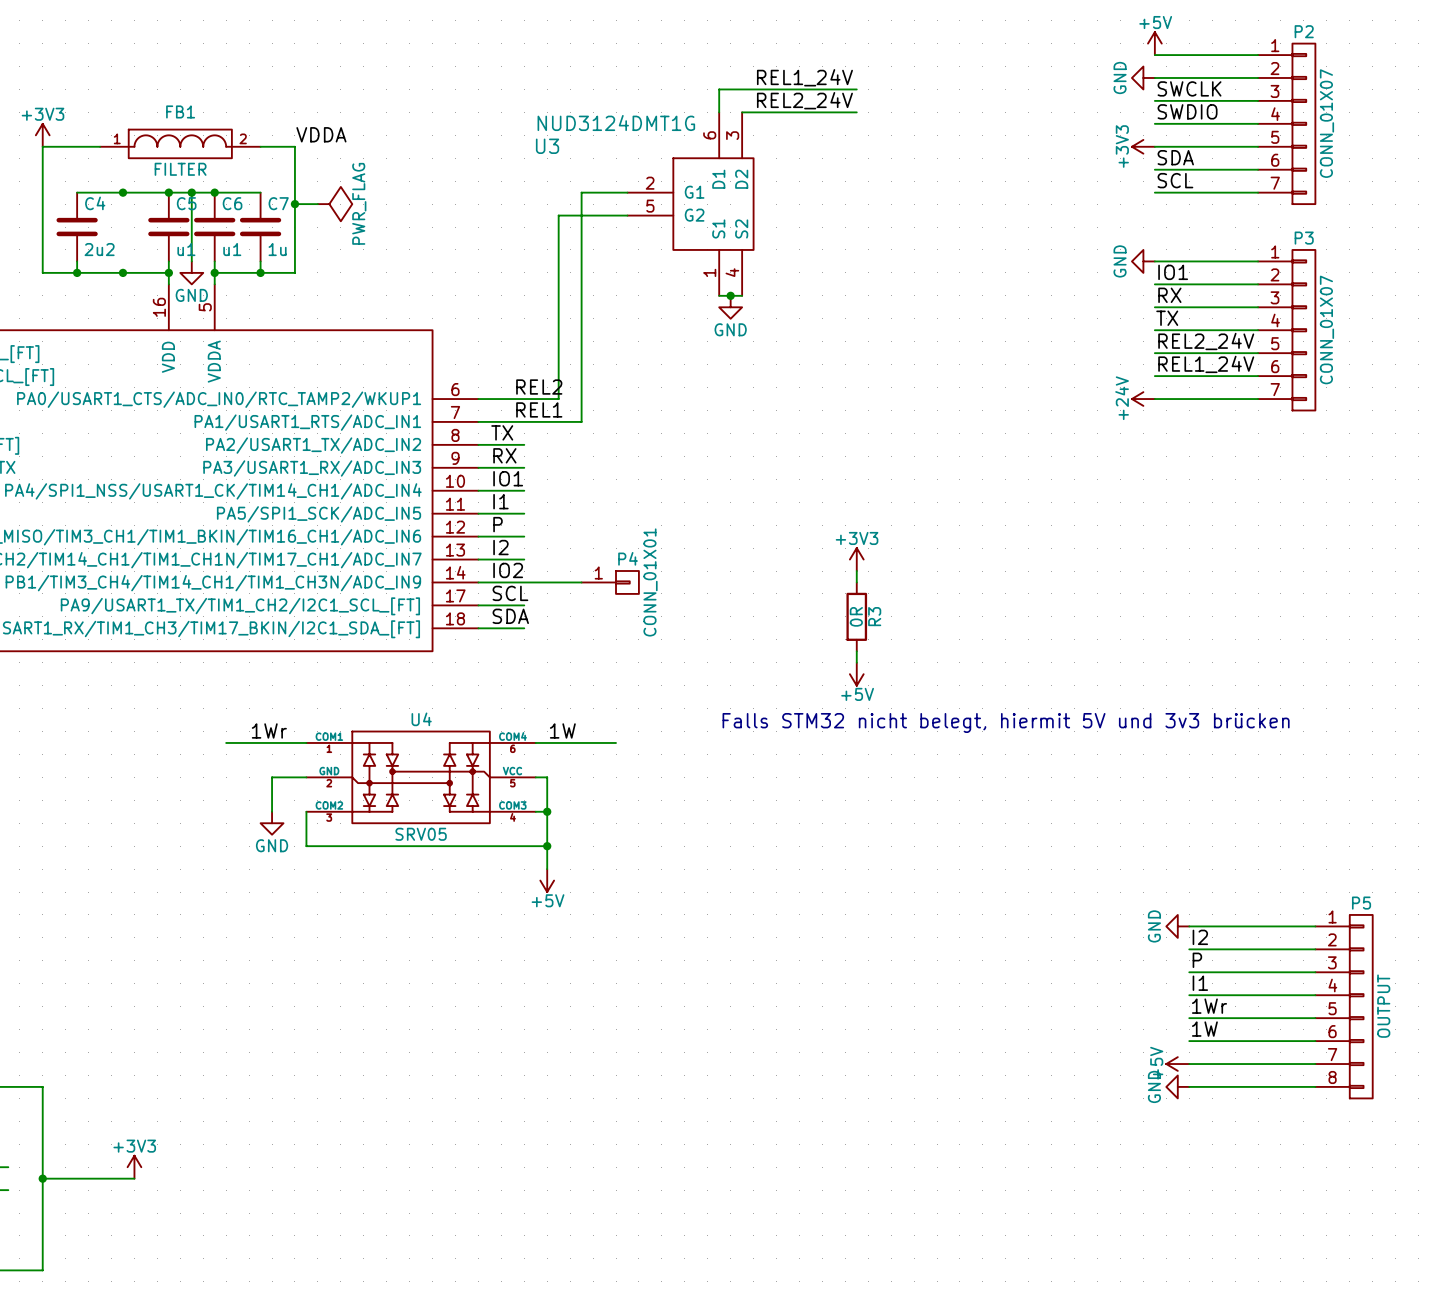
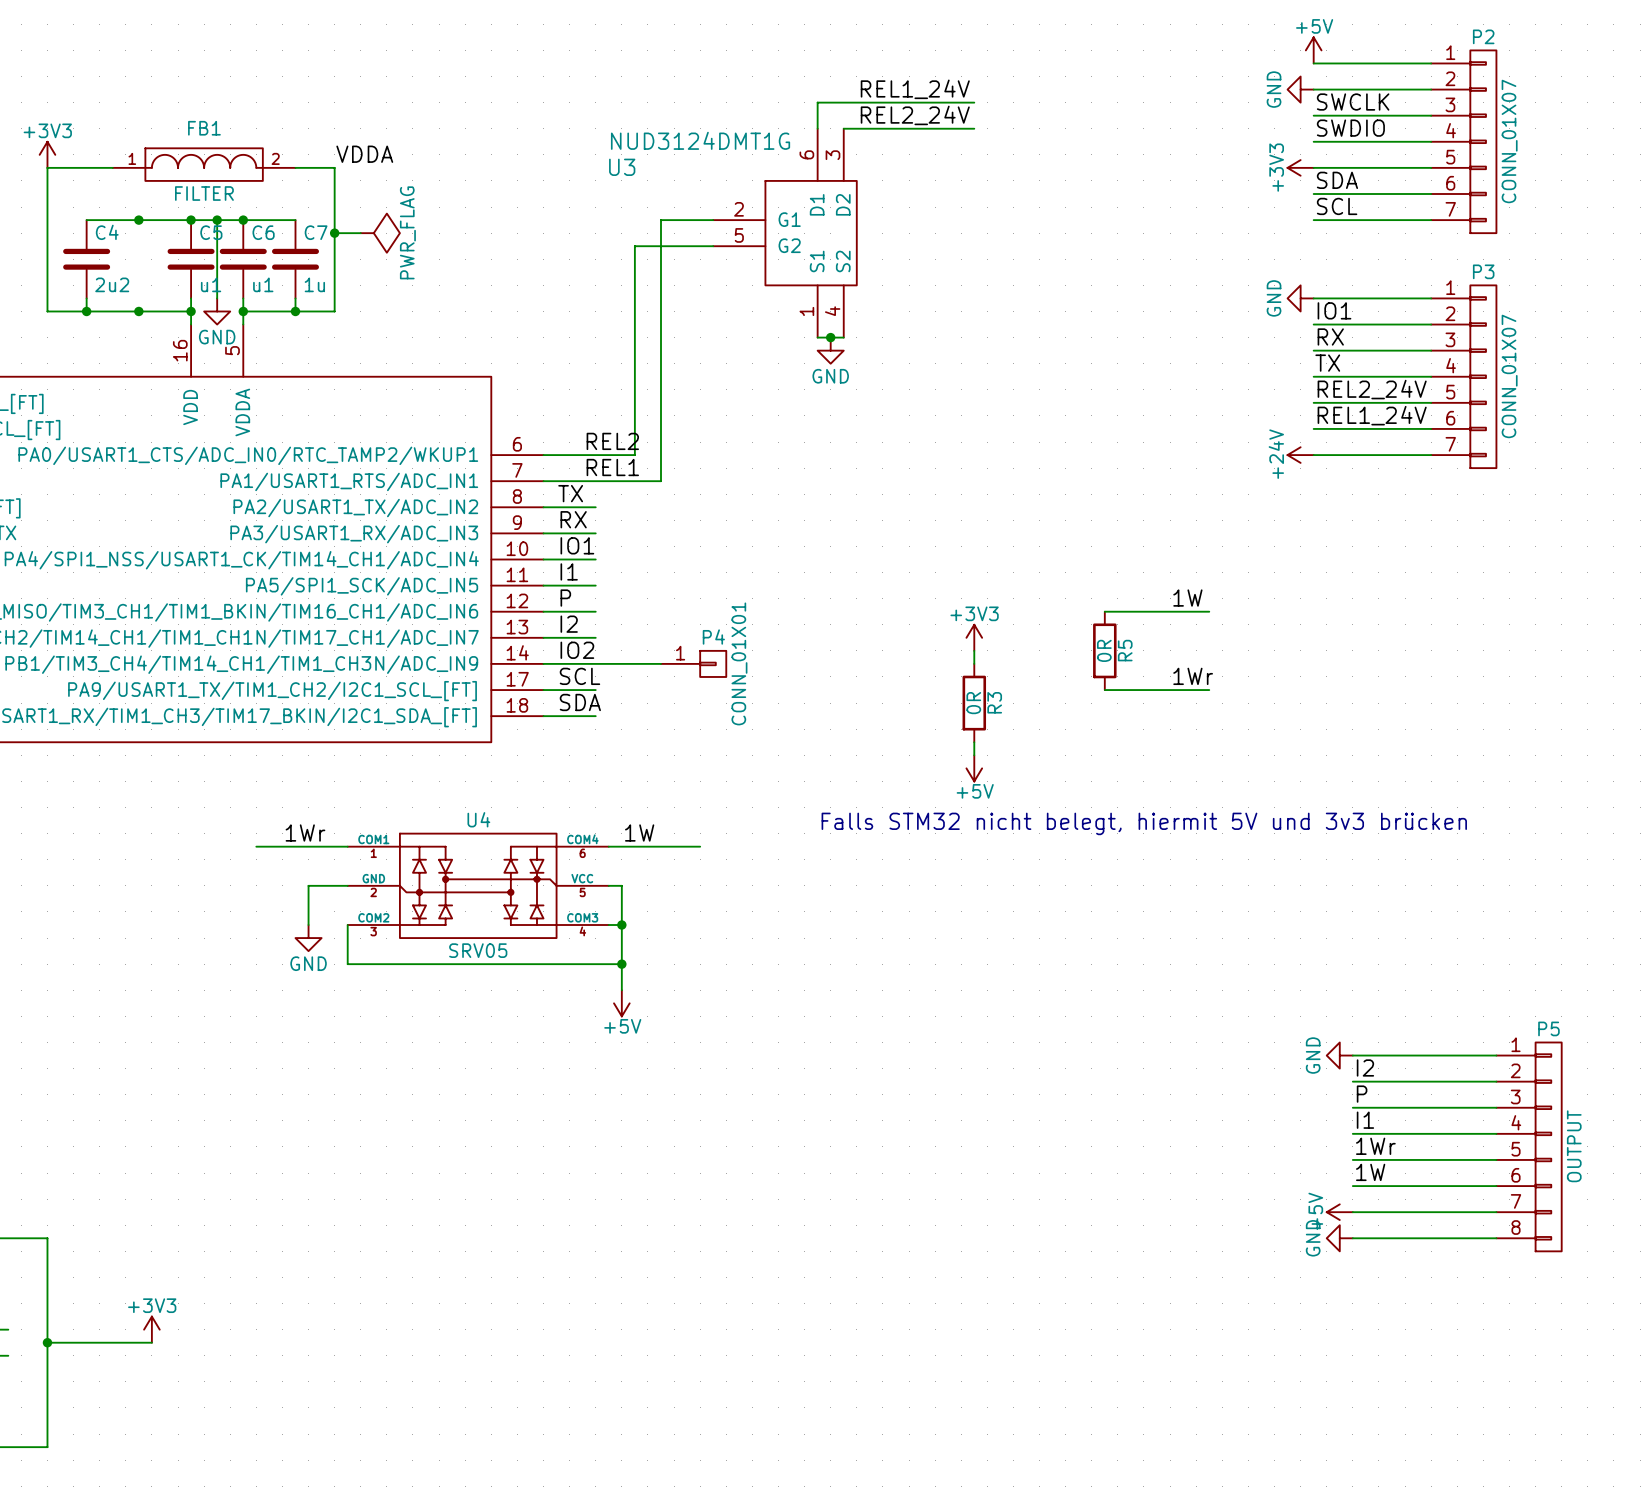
label: none -> 1W (1187, 598)
wire: none -> (1104, 611) (1209, 611)
R5: none -> 0R (1104, 650)
label: none -> 1Wr (1193, 676)
wire: none -> (1104, 690) (1209, 690)

